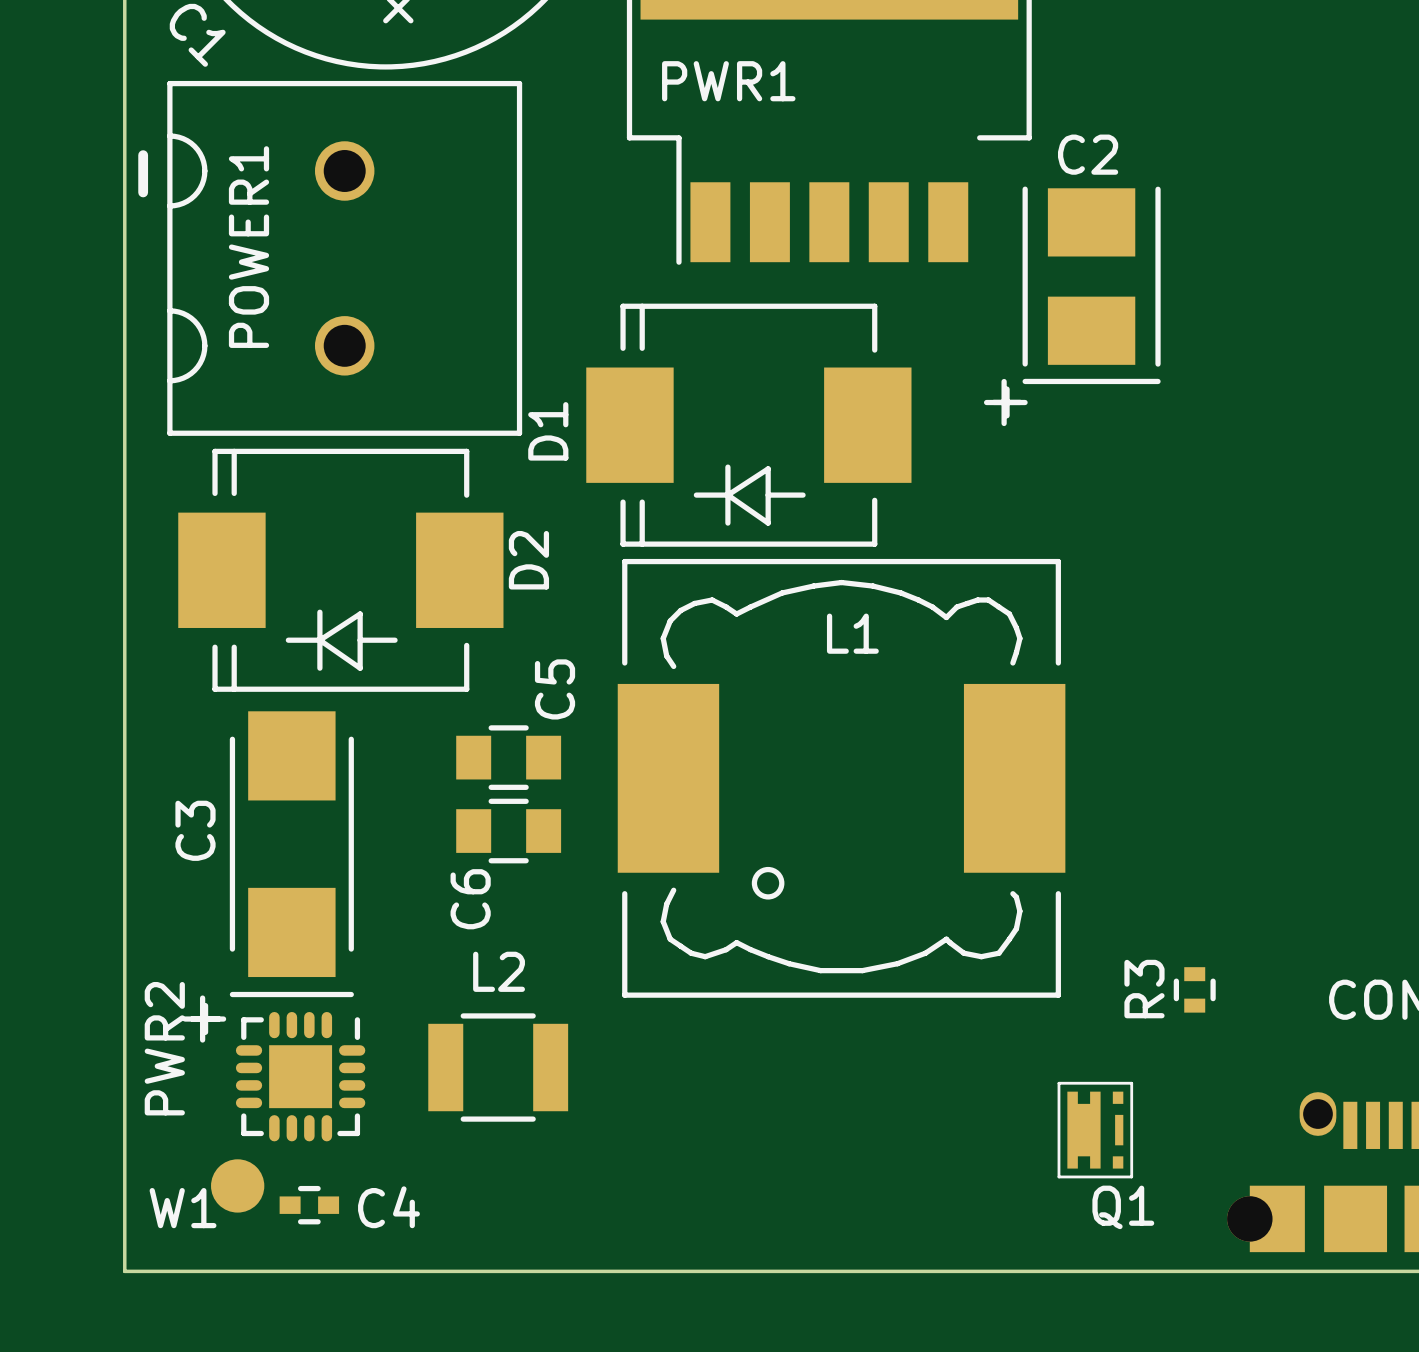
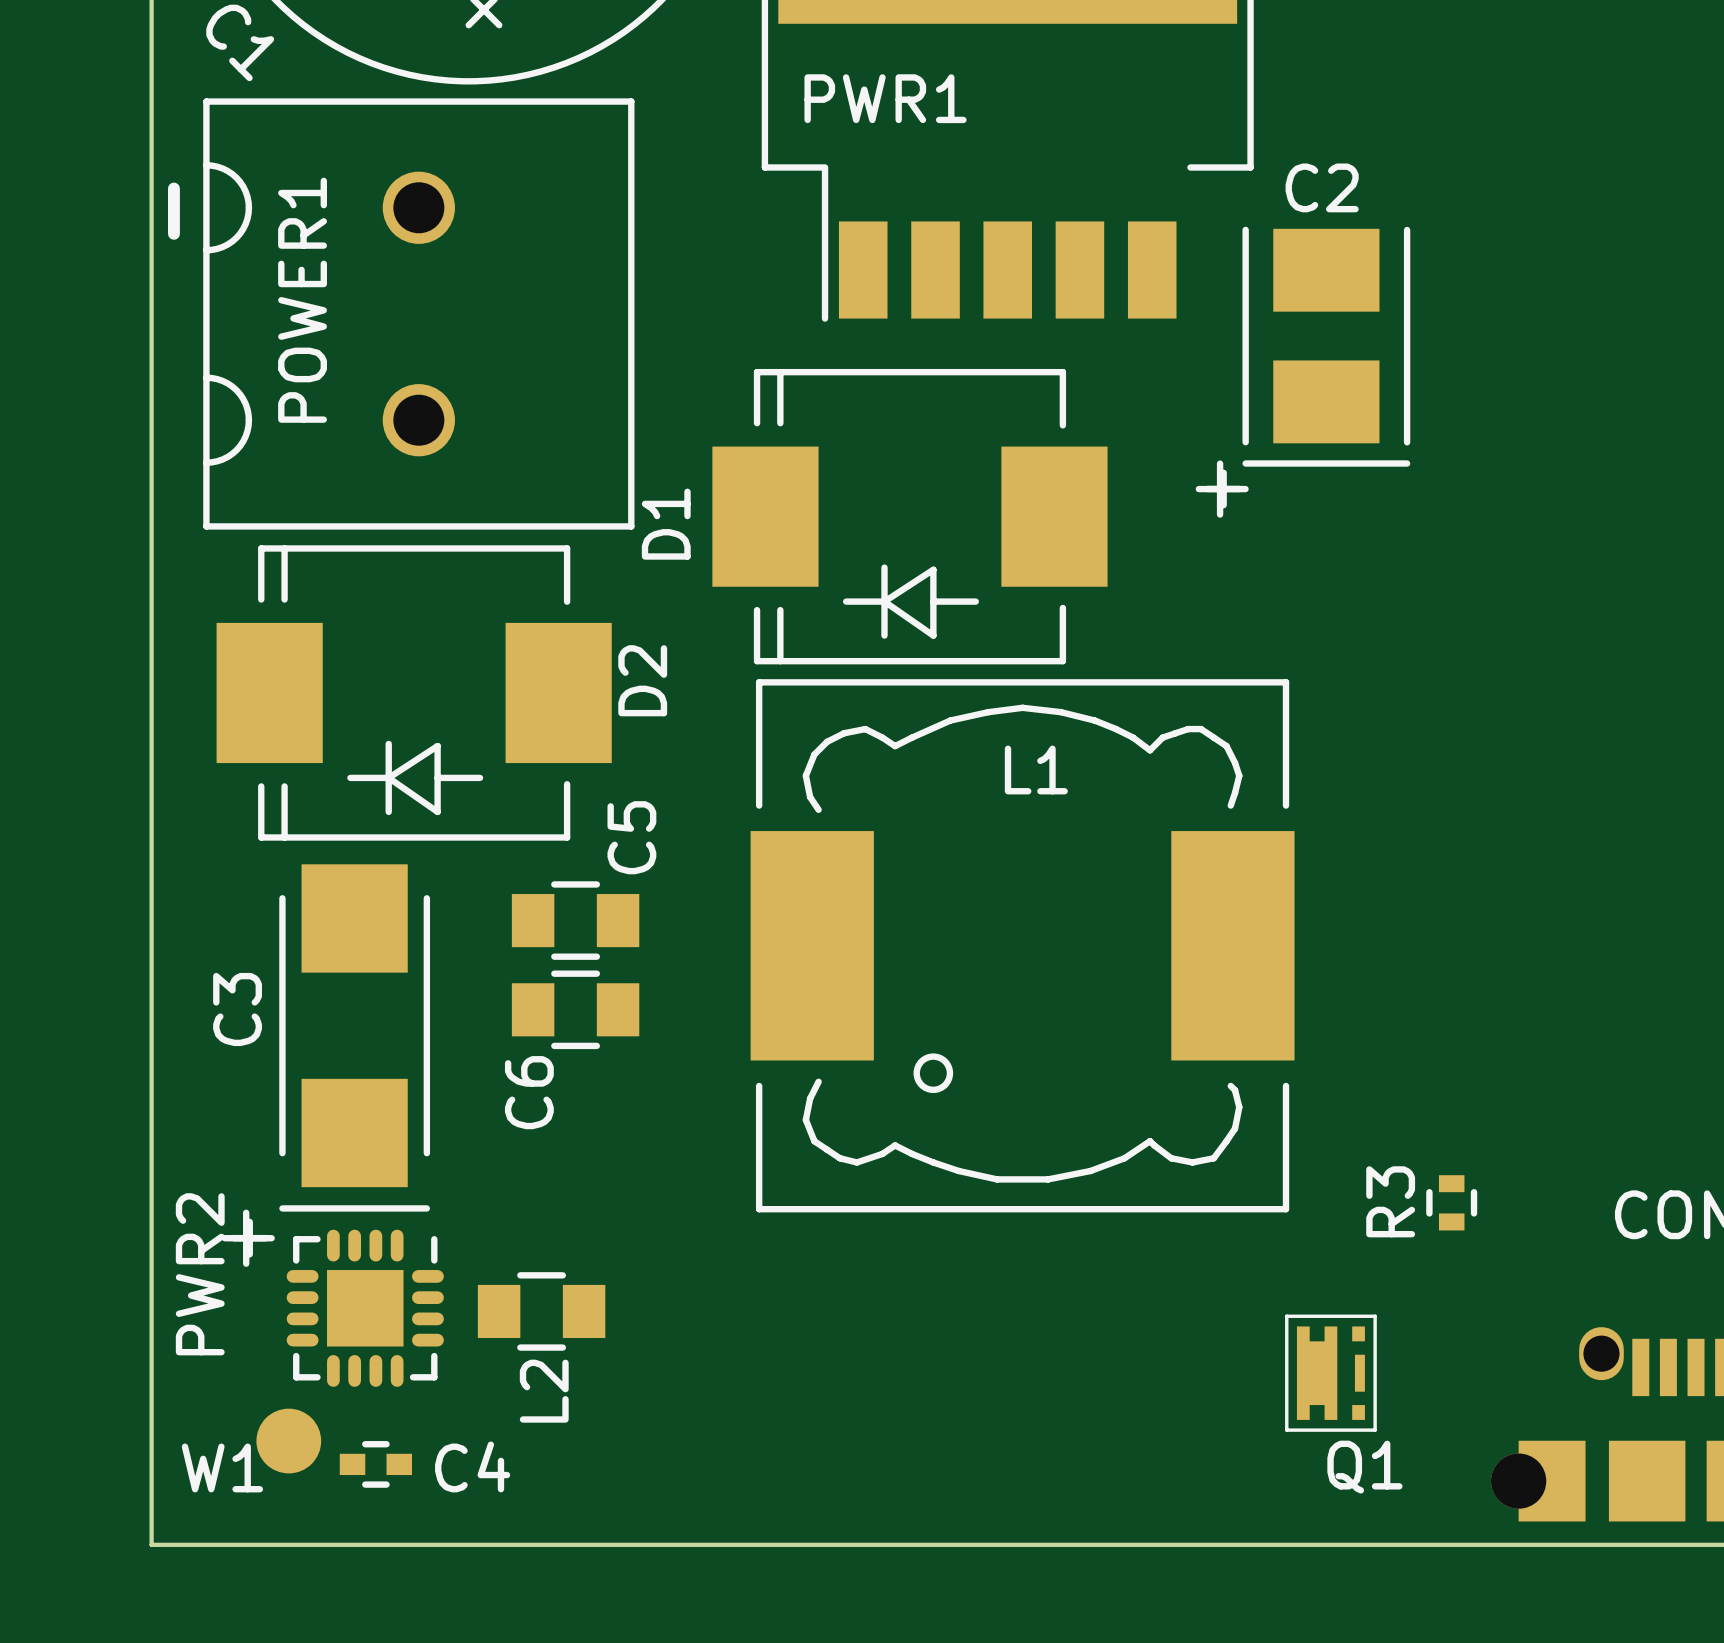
C5 position: (508, 757) -> (575, 920)
C6 position: (508, 831) -> (575, 1009)
L2 name position: L2 (499, 971) -> L2 (544, 1391)
L2 footprint: [428, 1013, 569, 1122] -> [477, 1272, 606, 1351]

